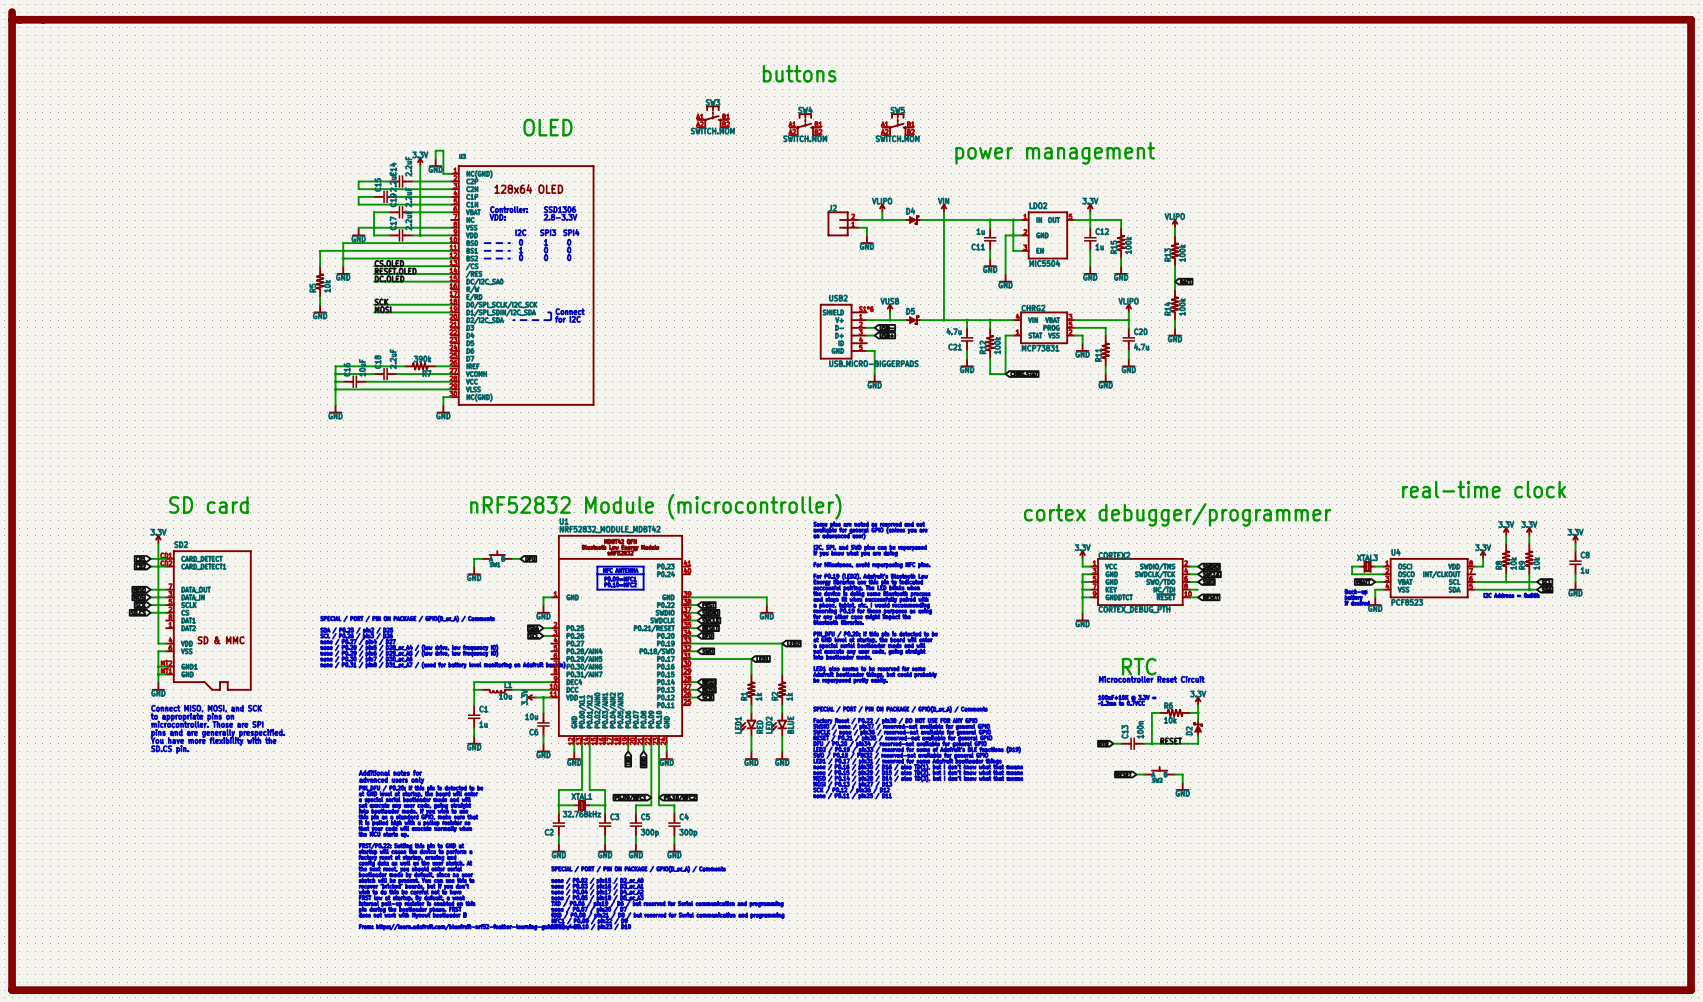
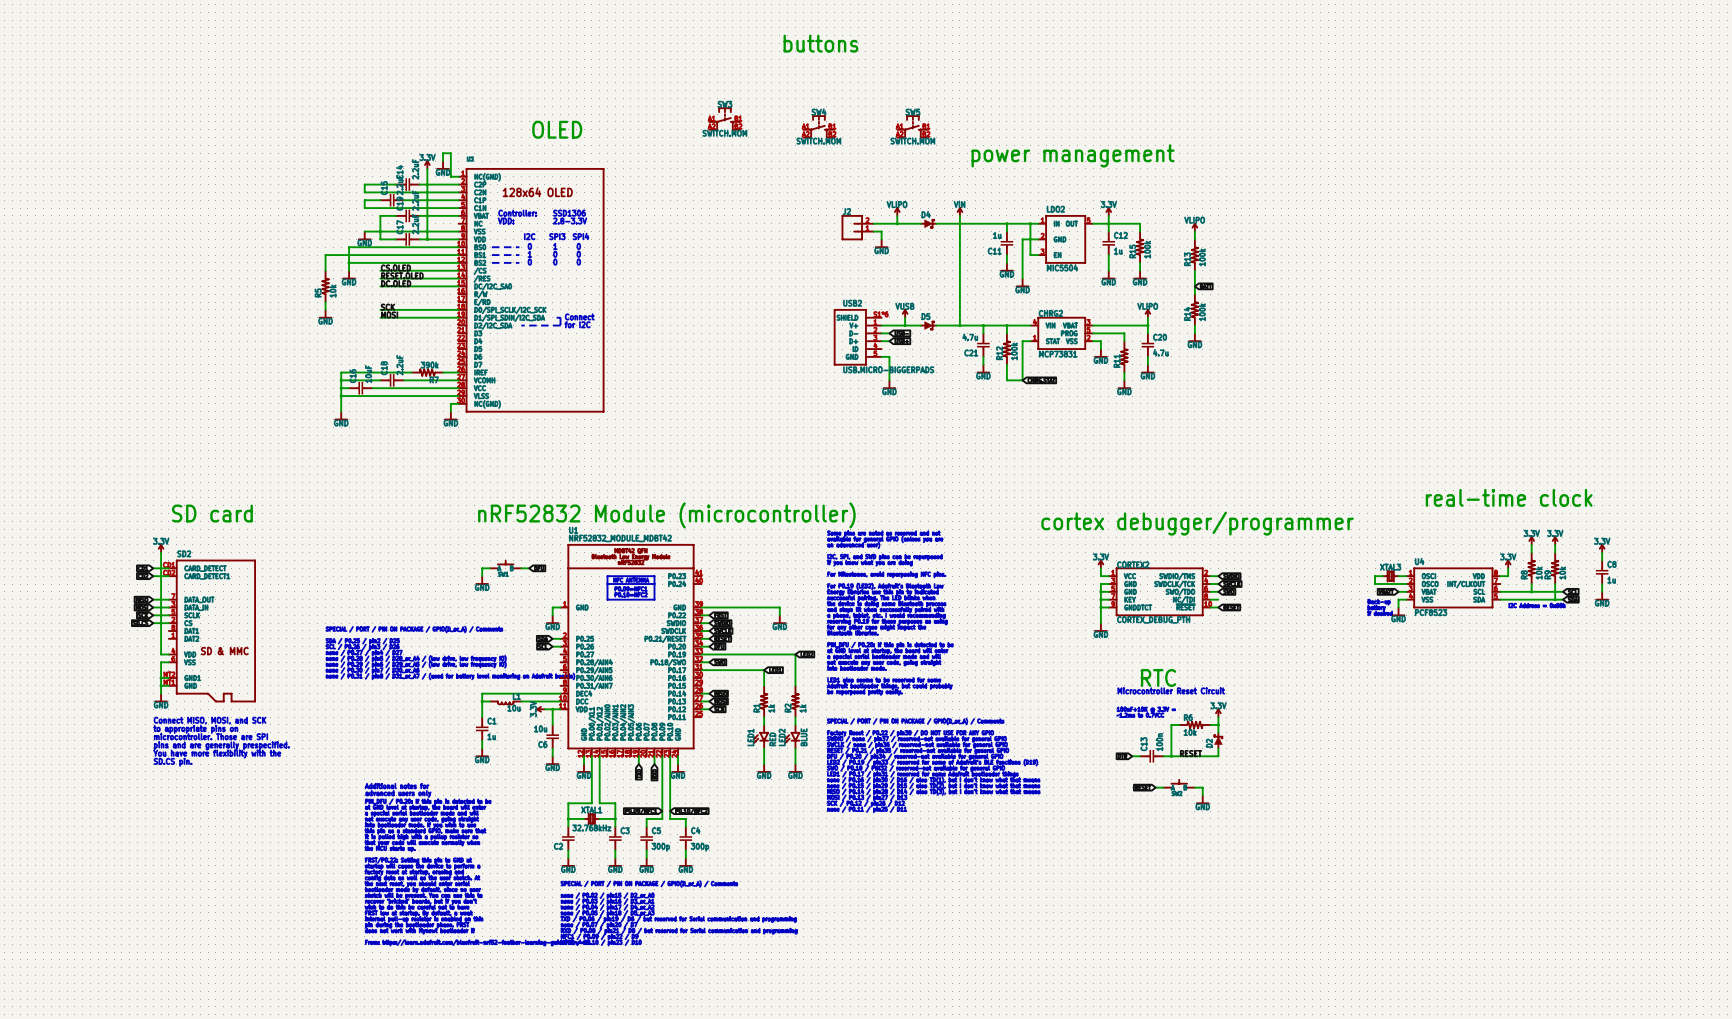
line: (12, 12) (12, 990) (1691, 990) (1691, 19) (12, 19) -> none
text position: buttons (799, 73) -> buttons (820, 43)

